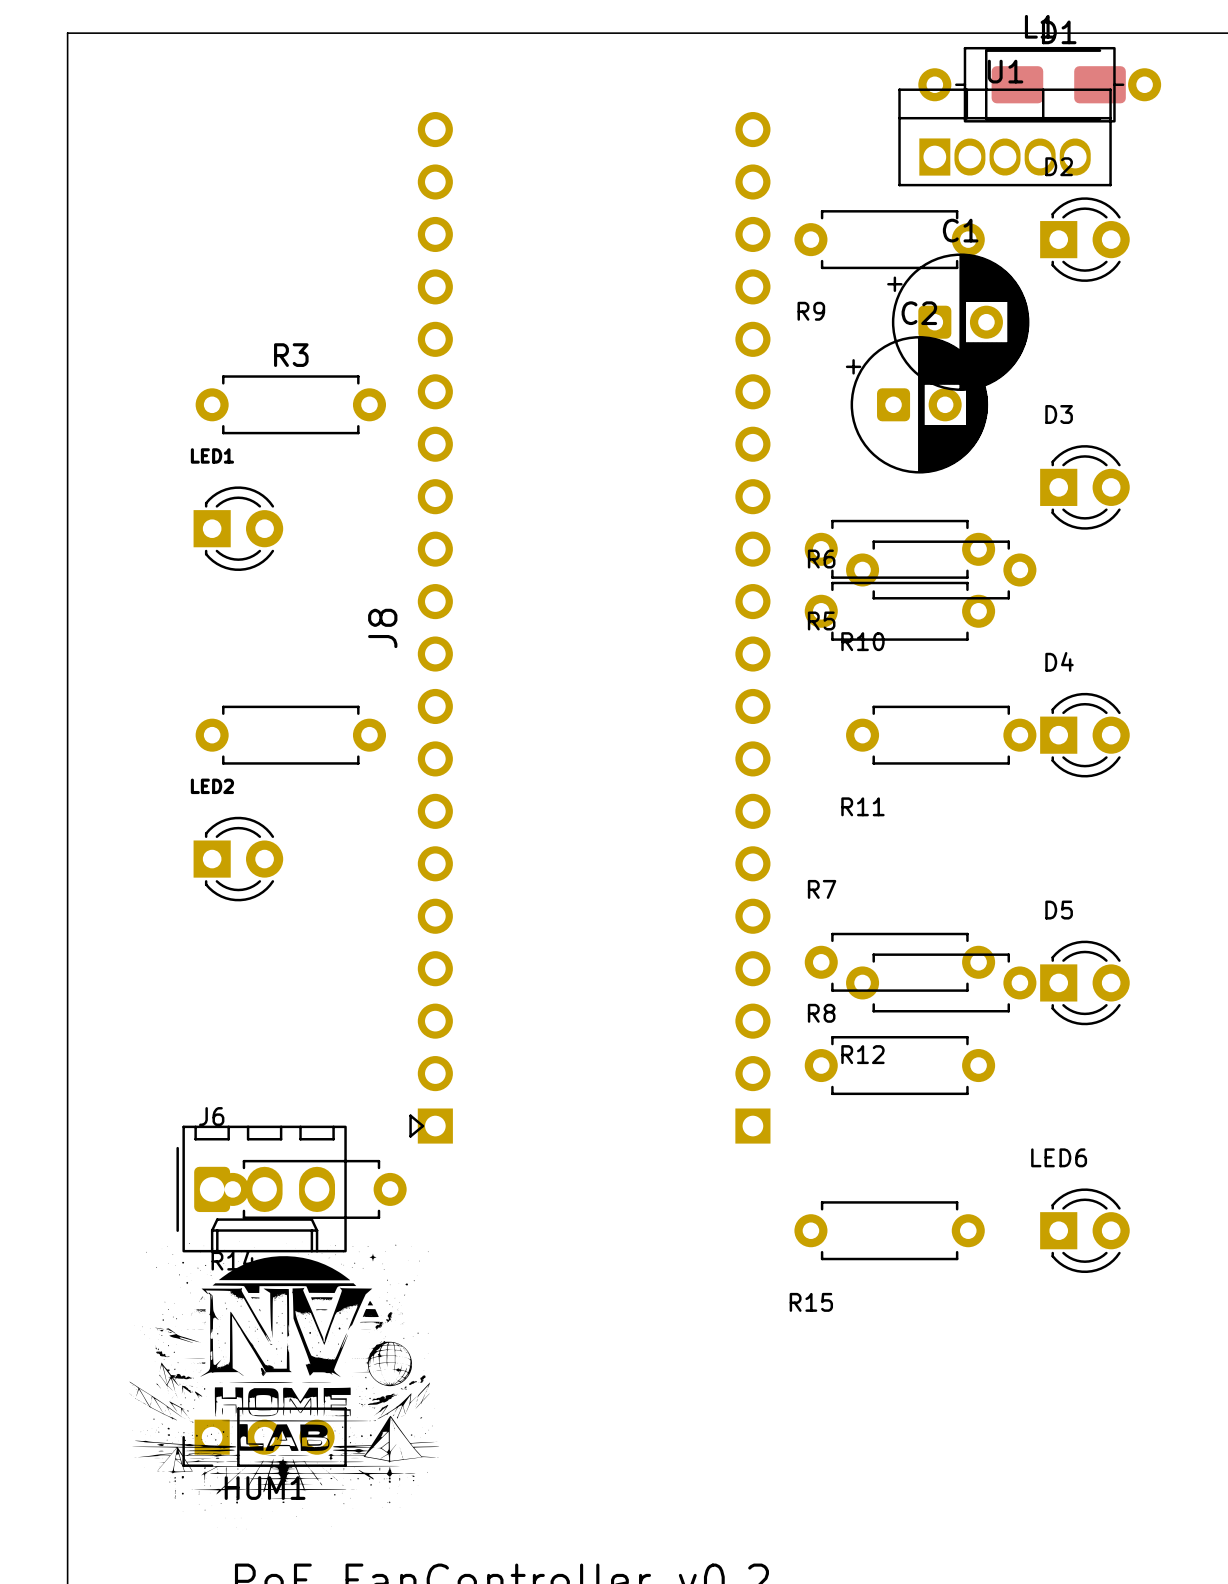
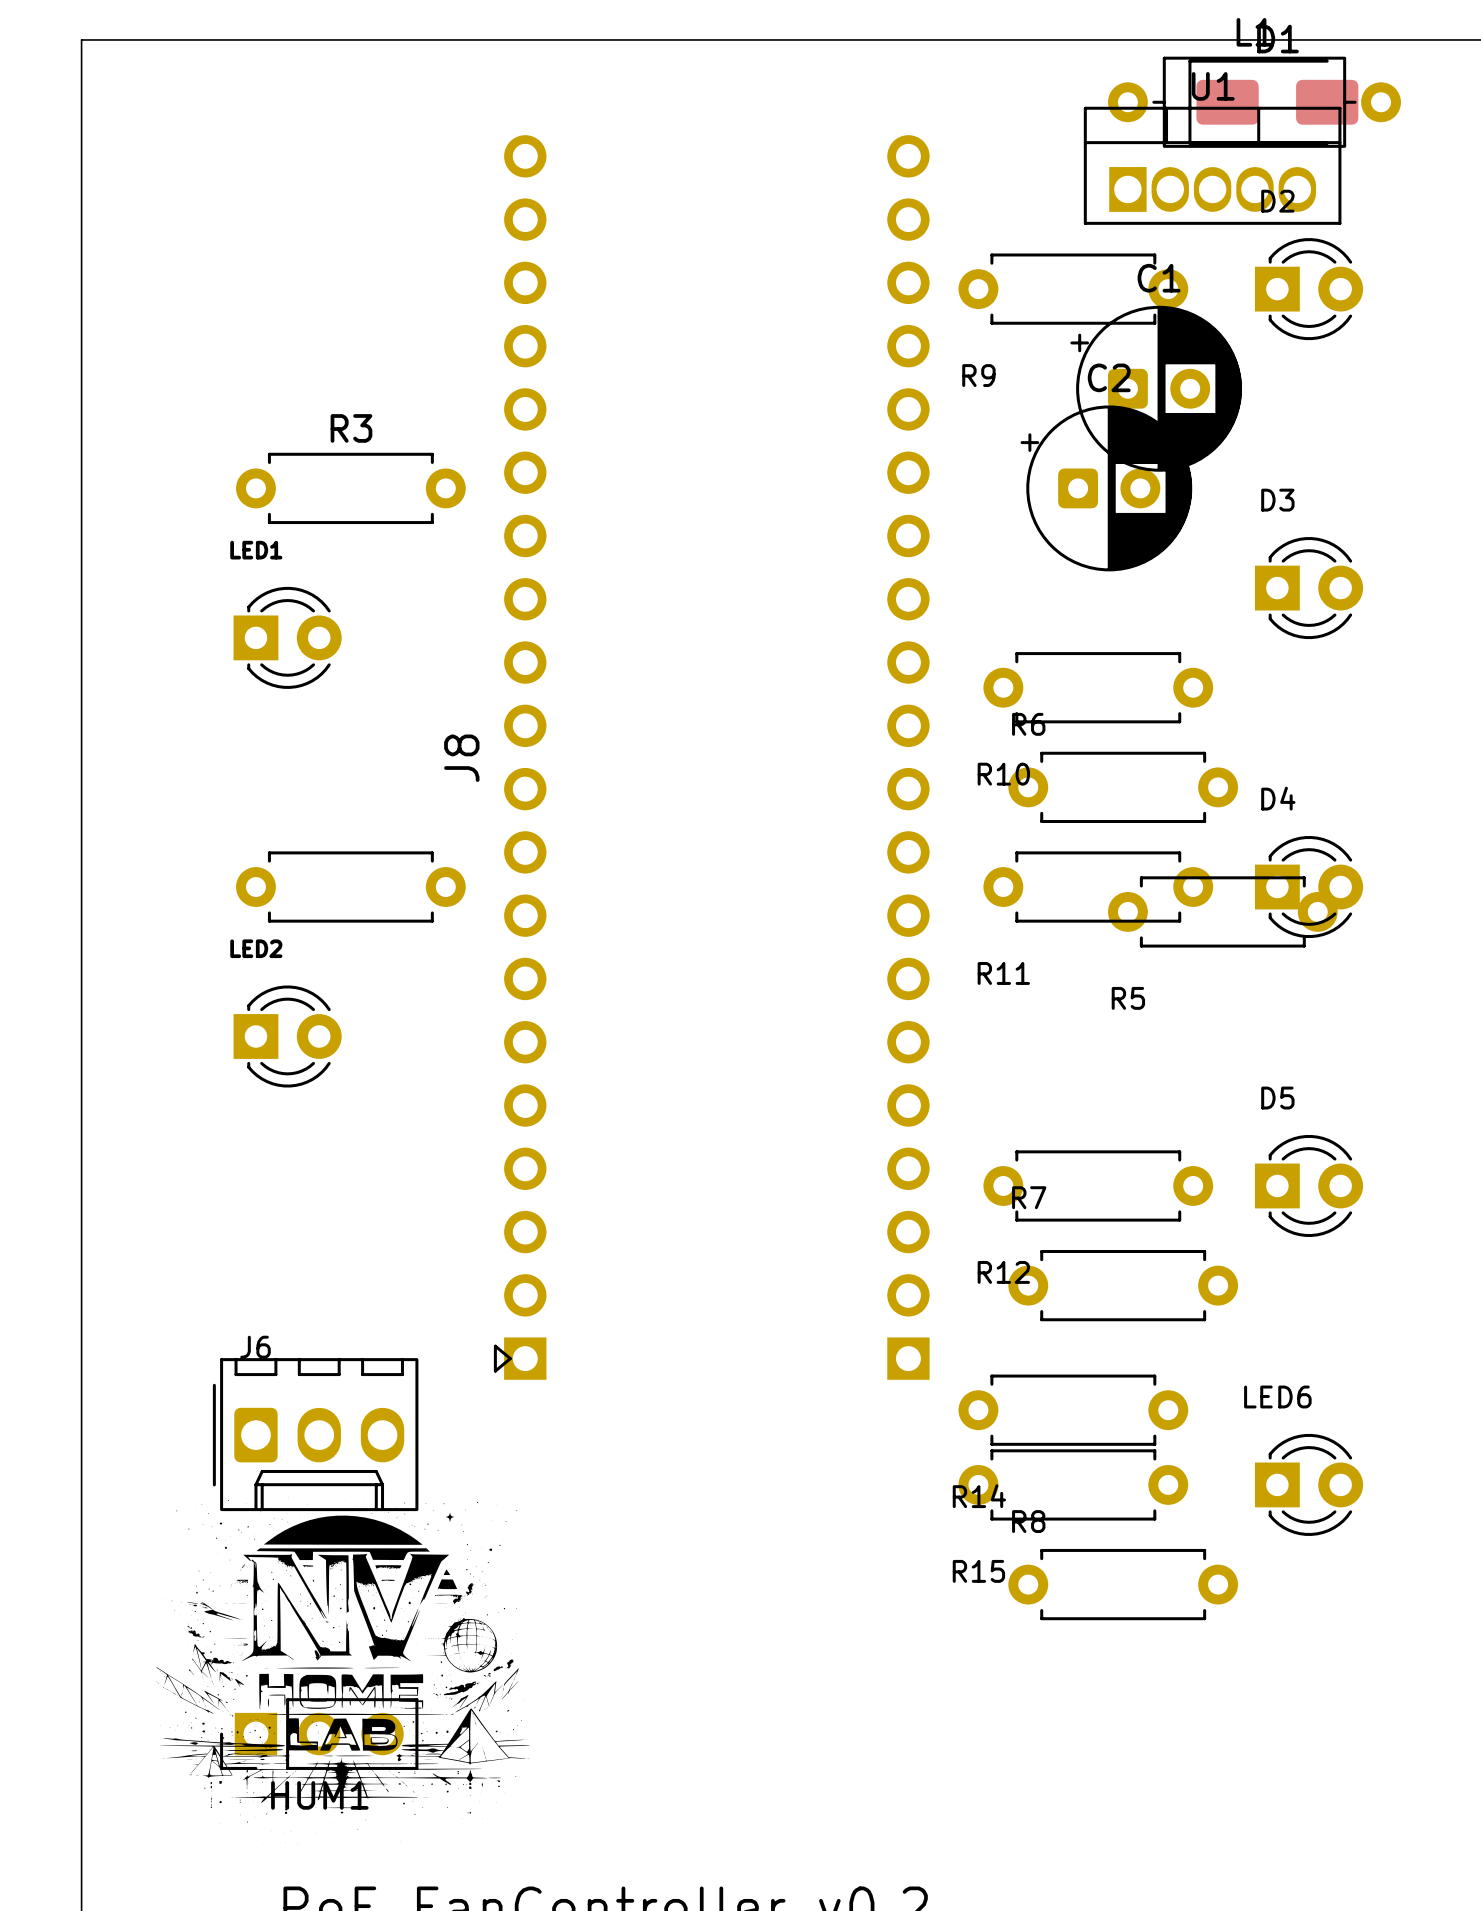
R5 position: (899, 549) -> (1222, 911)
R10 position: (941, 569) -> (1098, 687)
R6 position: (899, 611) -> (1123, 787)
R11 position: (941, 735) -> (1098, 887)
R7 position: (899, 962) -> (1123, 1285)
R12 position: (941, 982) -> (1098, 1185)
R8 position: (899, 1065) -> (1123, 1584)
R14 position: (311, 1189) -> (1073, 1410)

